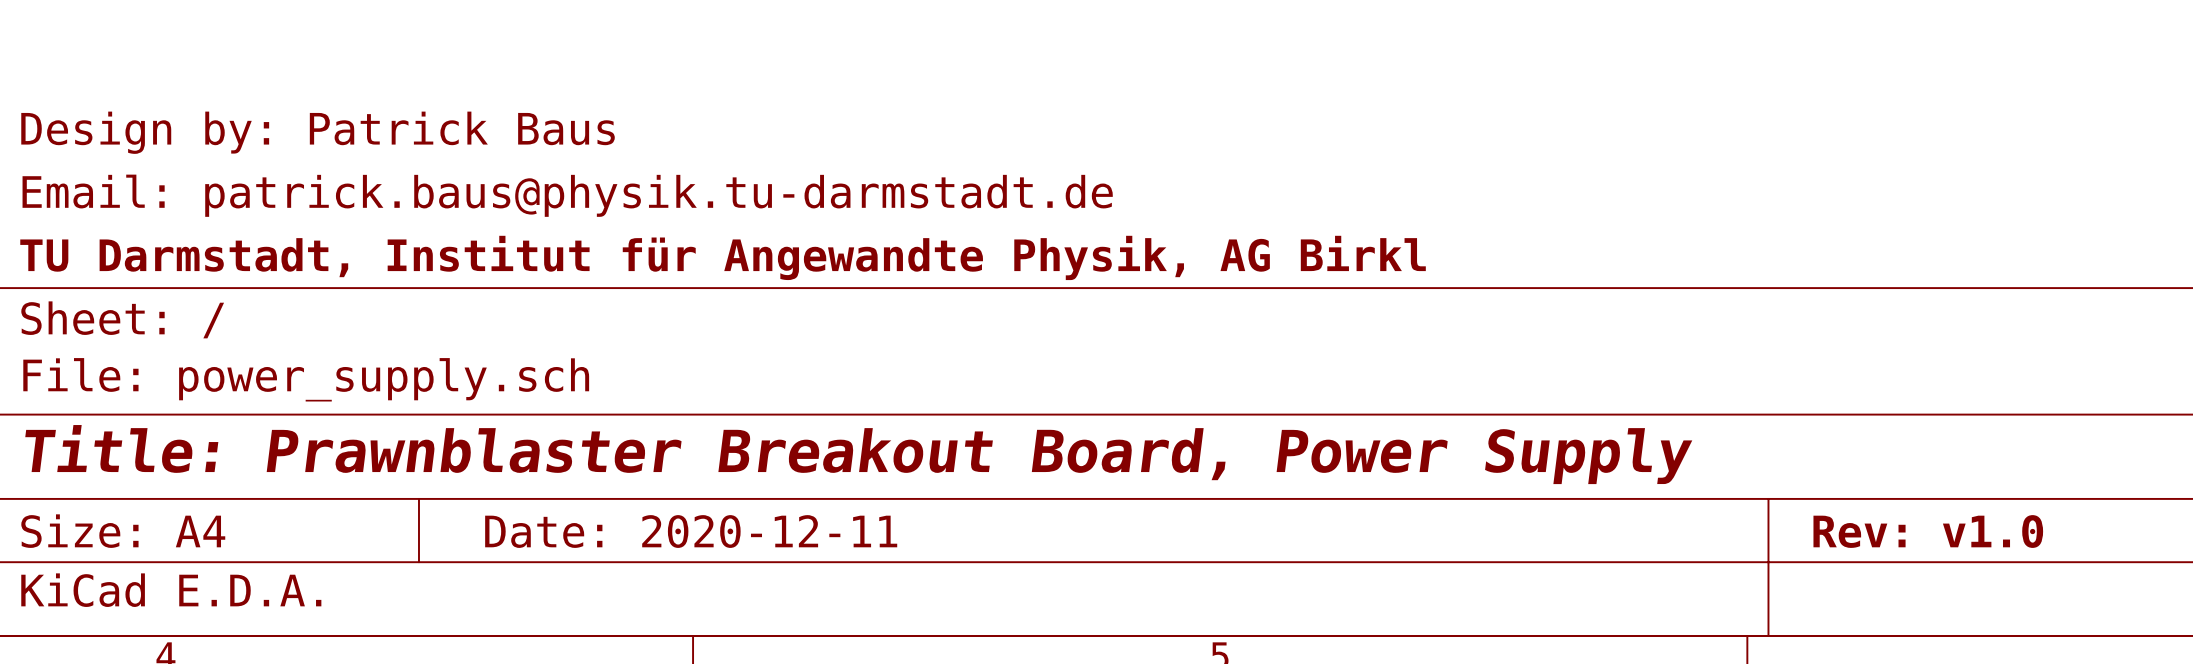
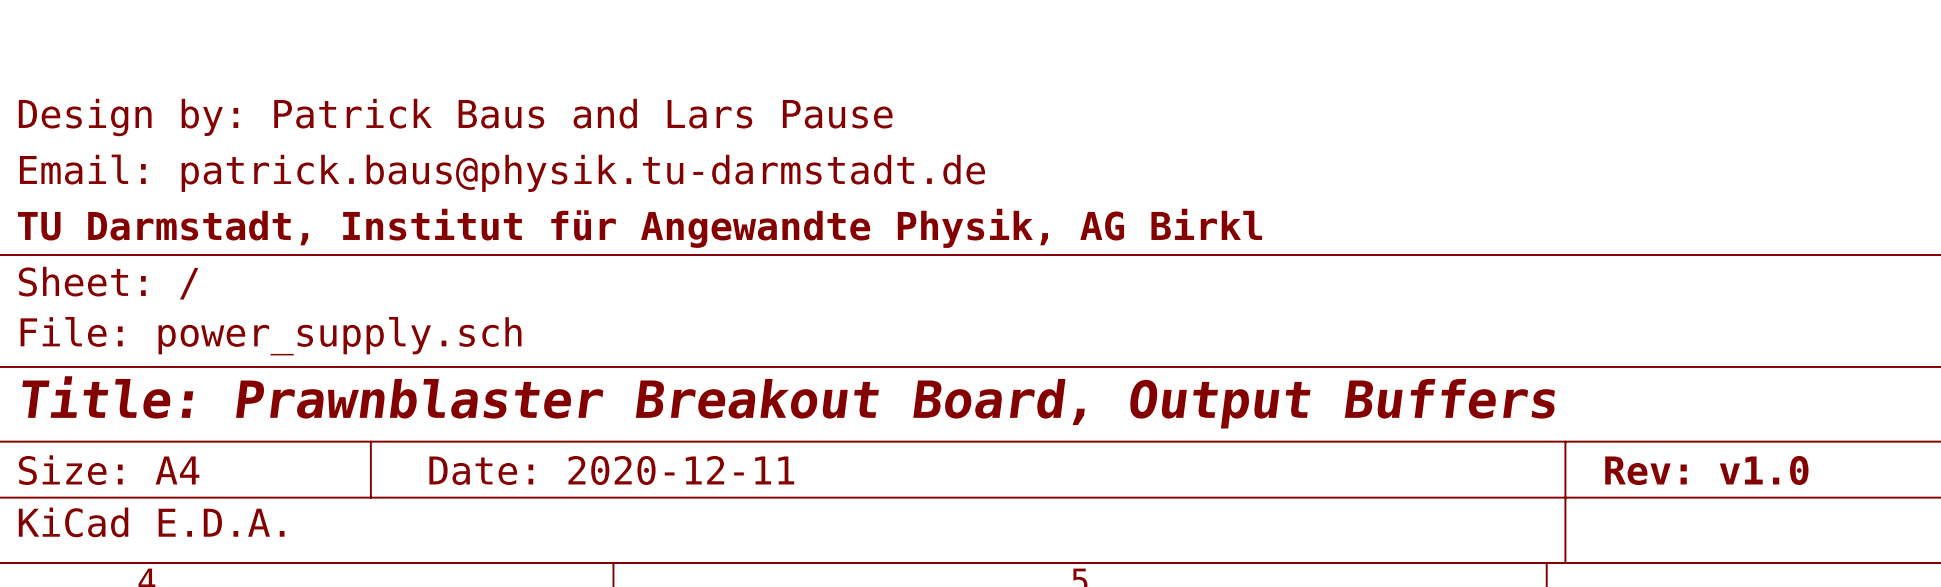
title block: Design by: Patrick Baus (318, 132) -> Design by: Patrick Baus and Lars Pause (455, 117)
title block: Title: Prawnblaster Breakout Board, Power Supply (858, 454) -> Title: Prawnblaster Breakout Board, Output Buffers (788, 402)

